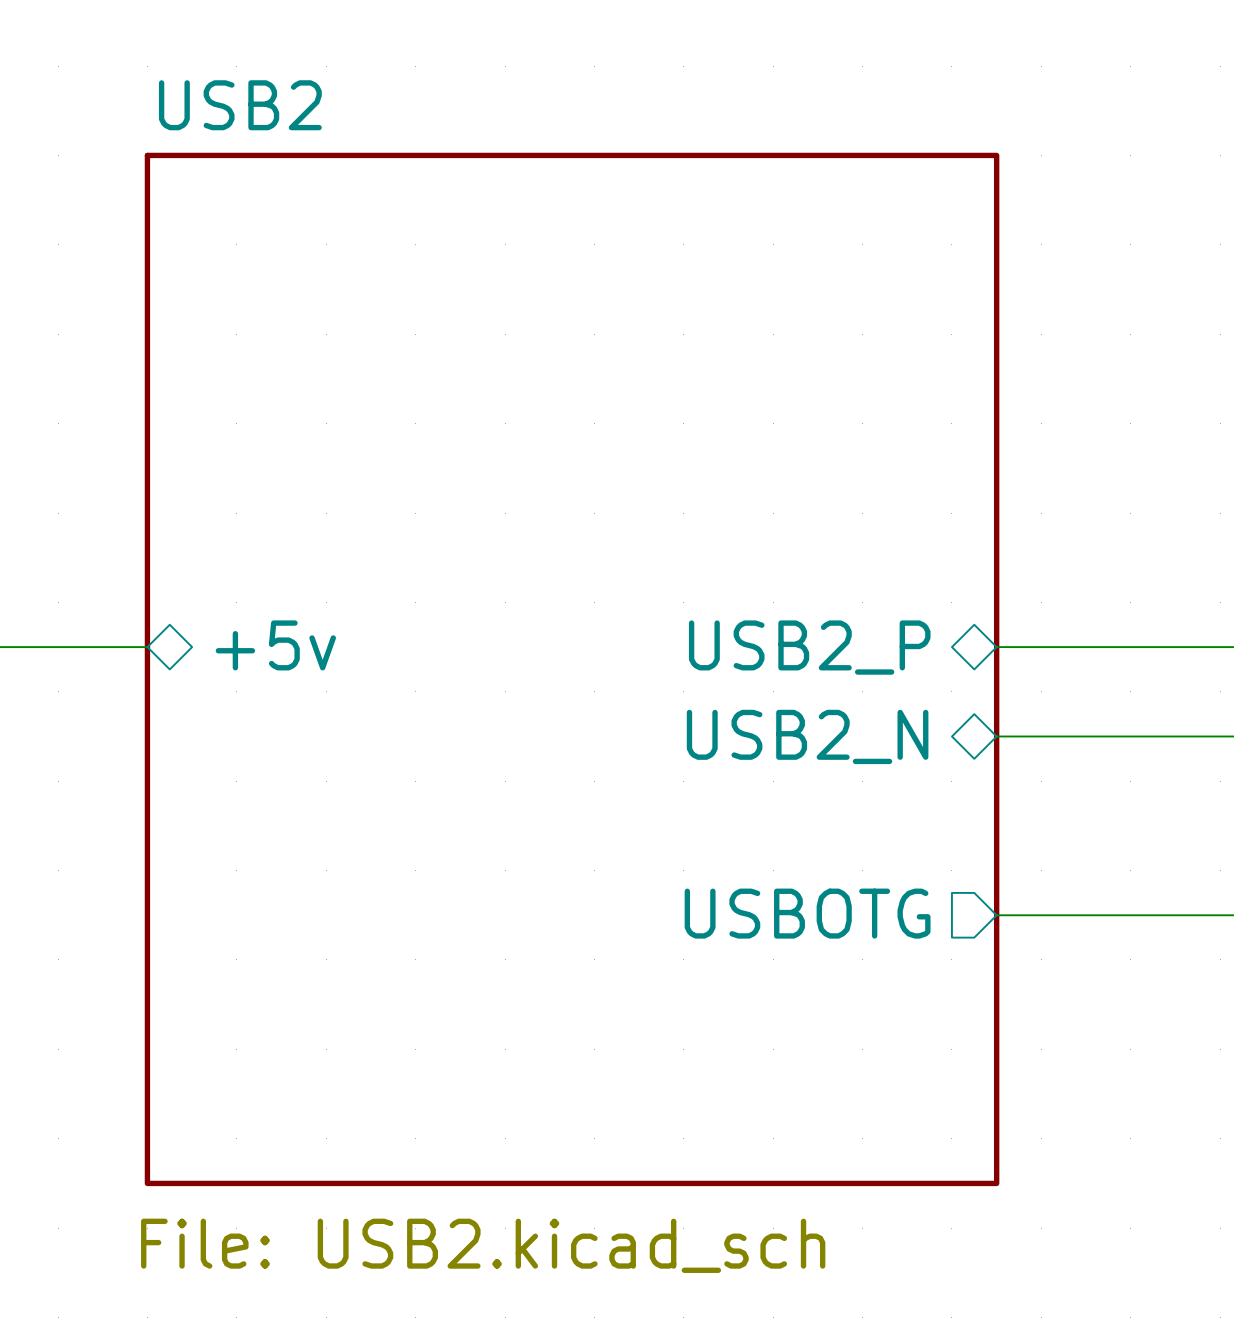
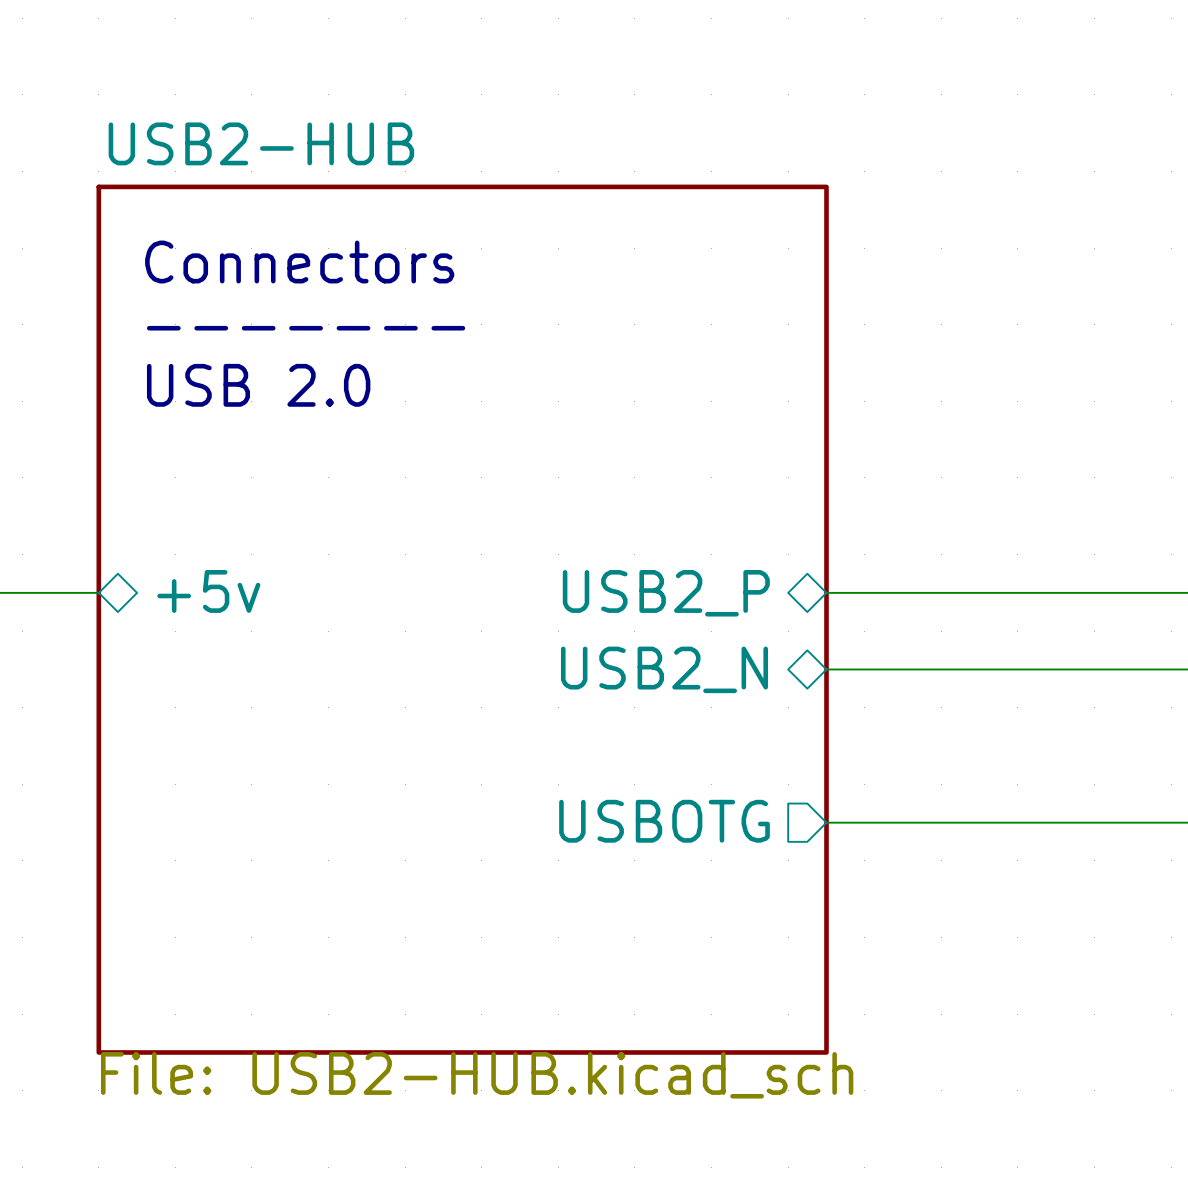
text: none -> Connectors (299, 262)
text: none -> ------- (306, 328)
text: none -> USB 2.0 (258, 385)
sheet USB2: File: USB2.kicad_sch (572, 669) -> none
sheet USB2-HUB: none -> File: USB2-HUB.kicad_sch (462, 619)

